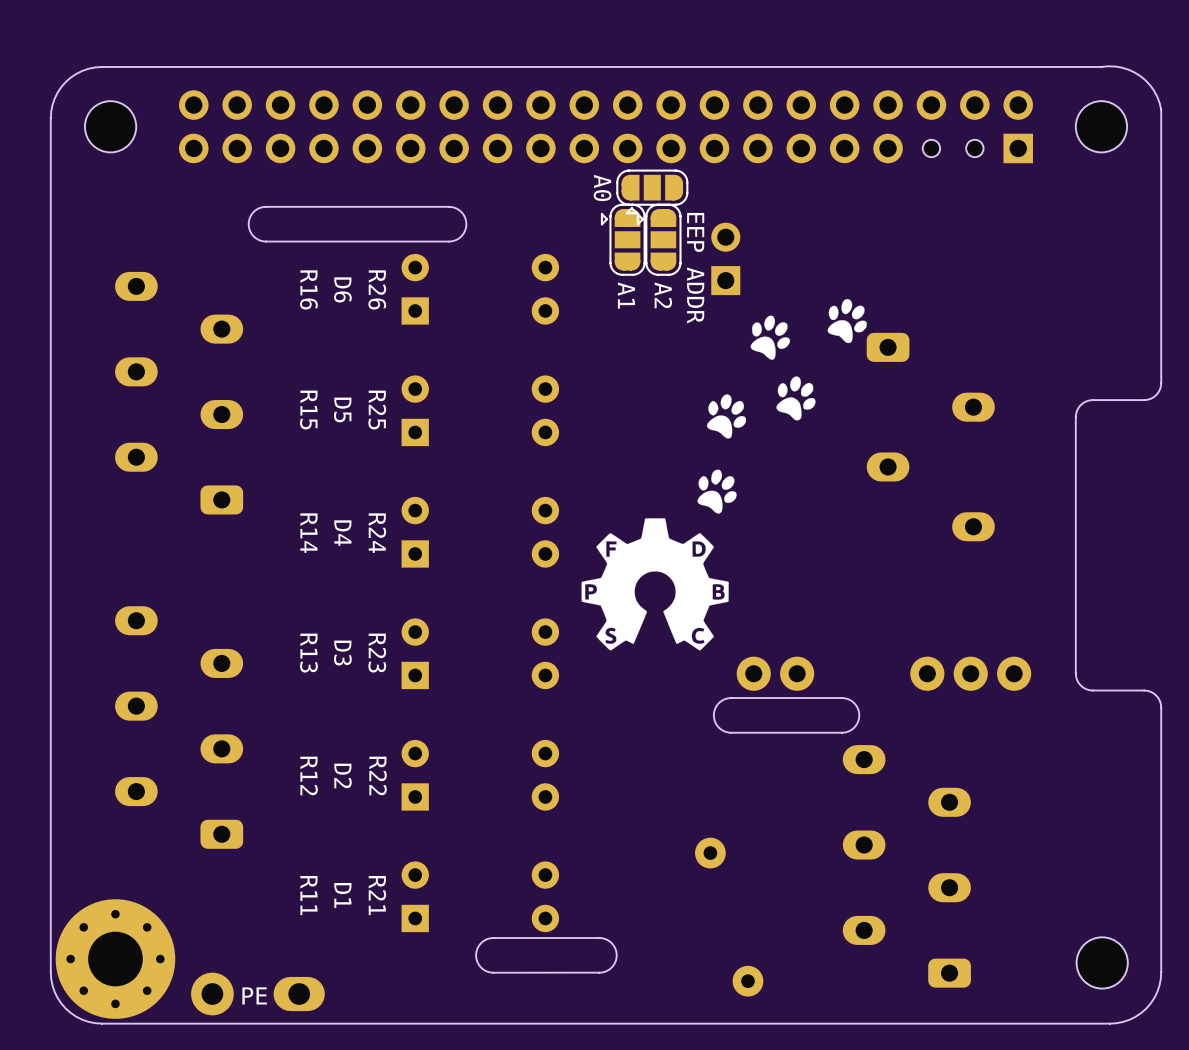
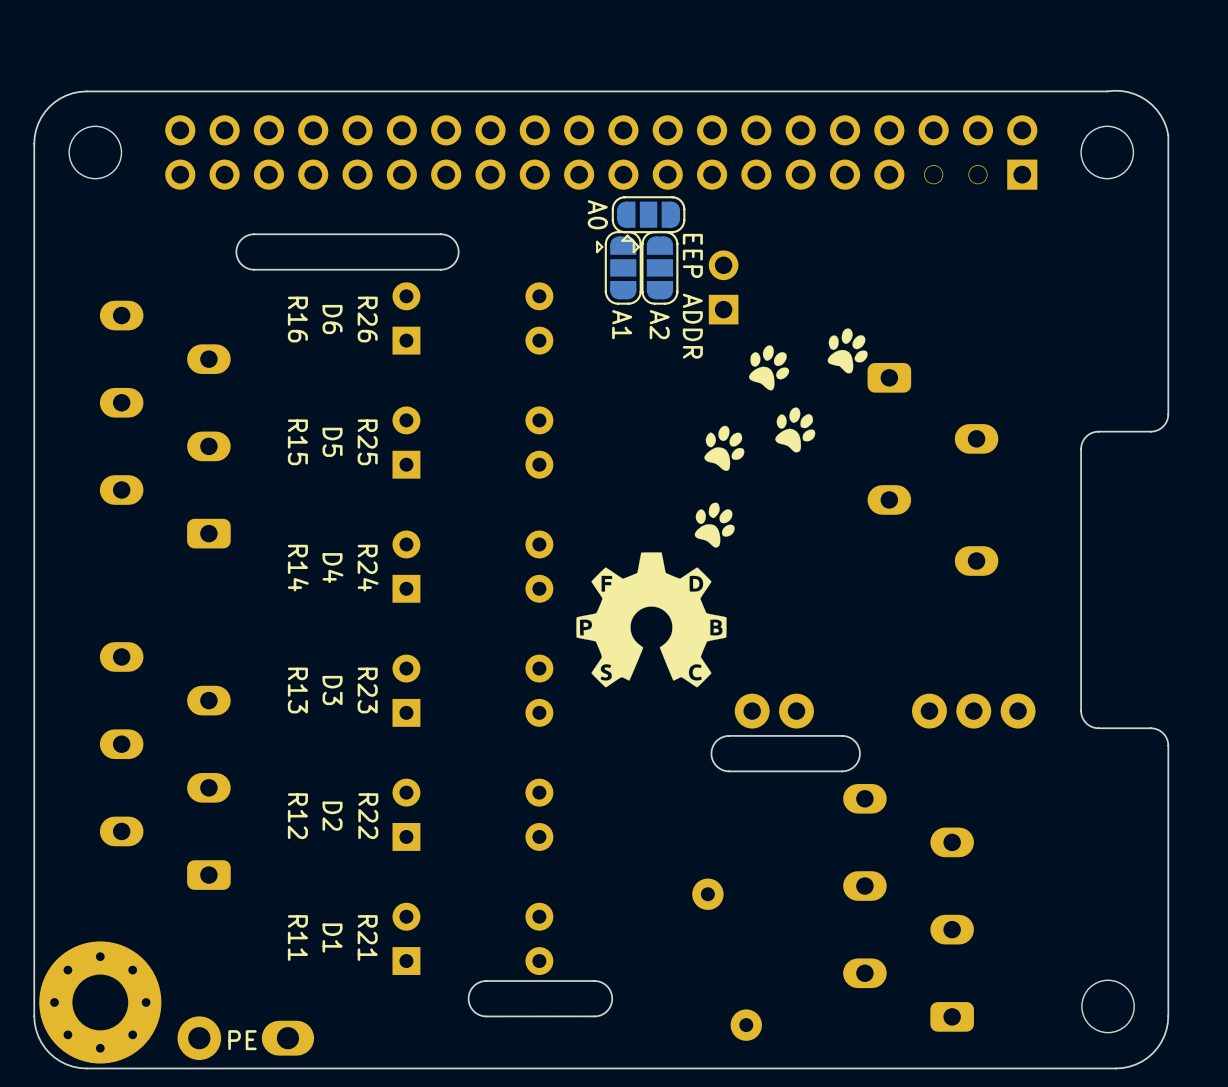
part footprint: [179, 90, 1033, 164] -> [165, 115, 1038, 190]

